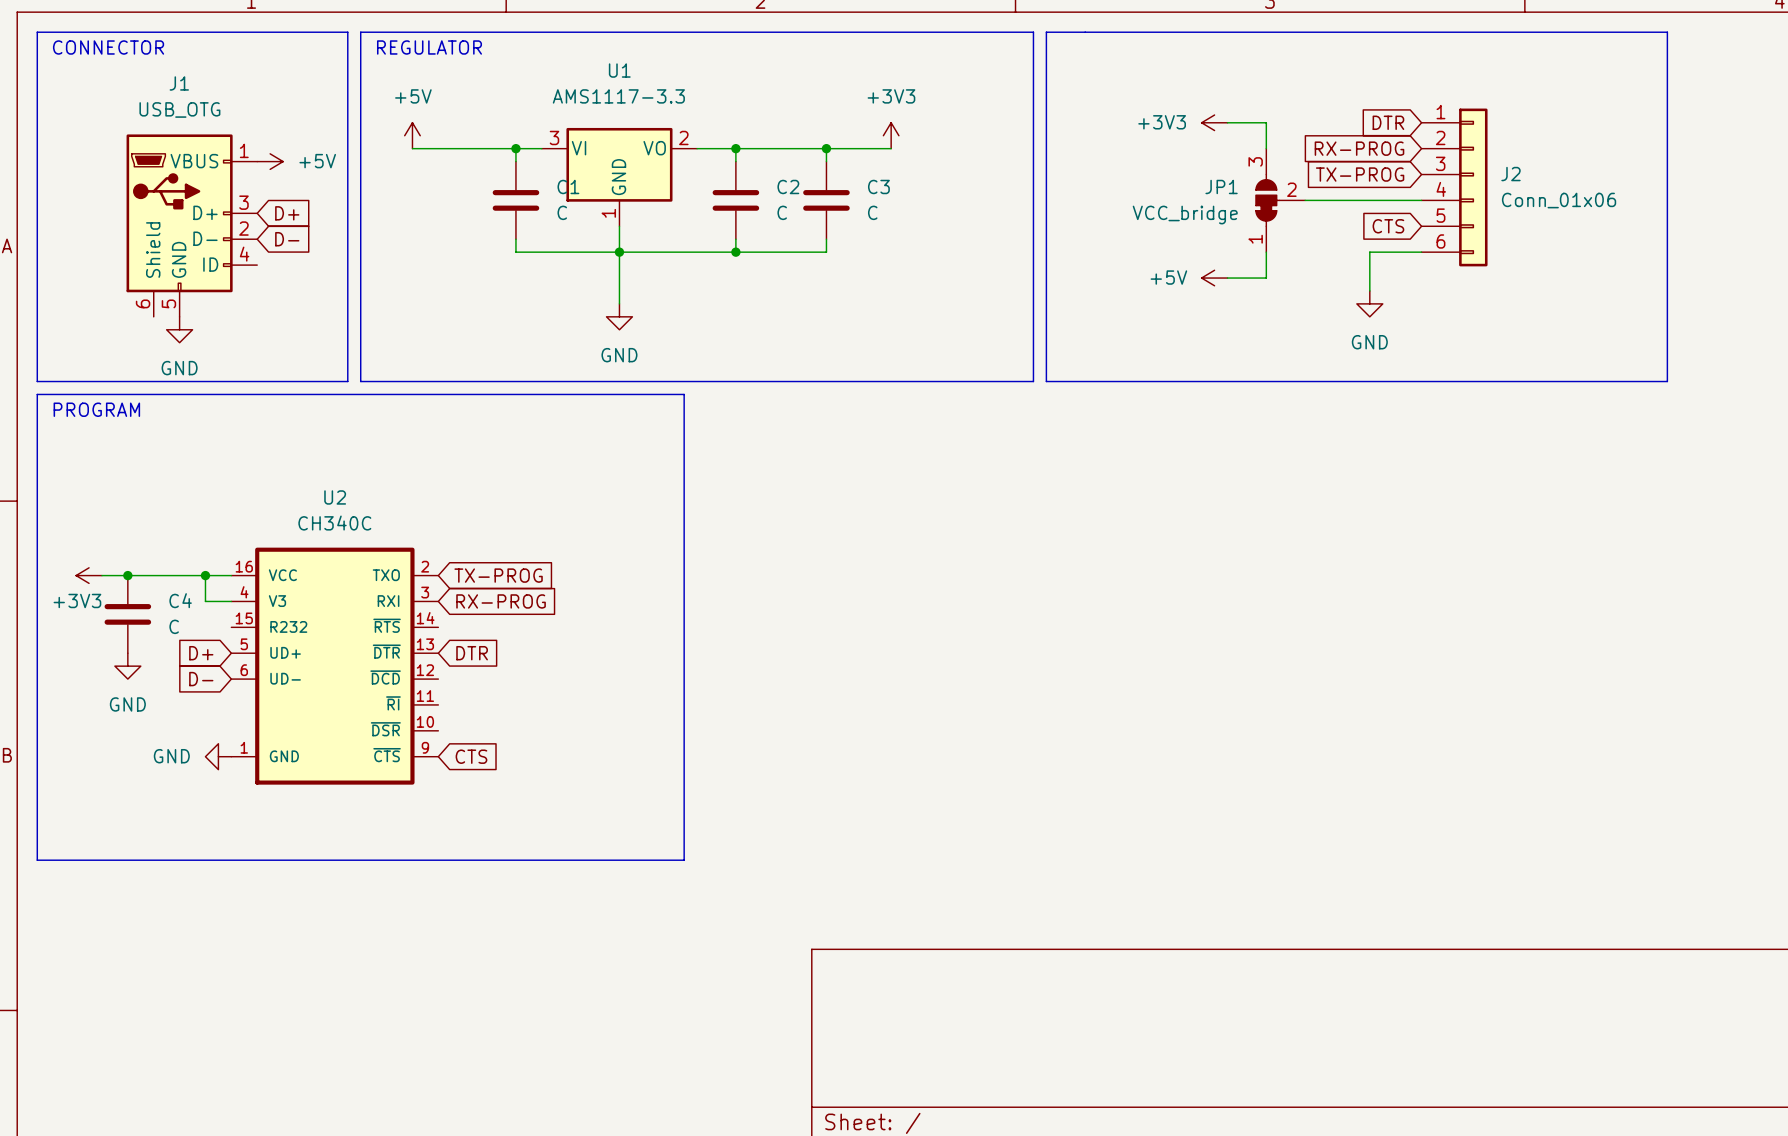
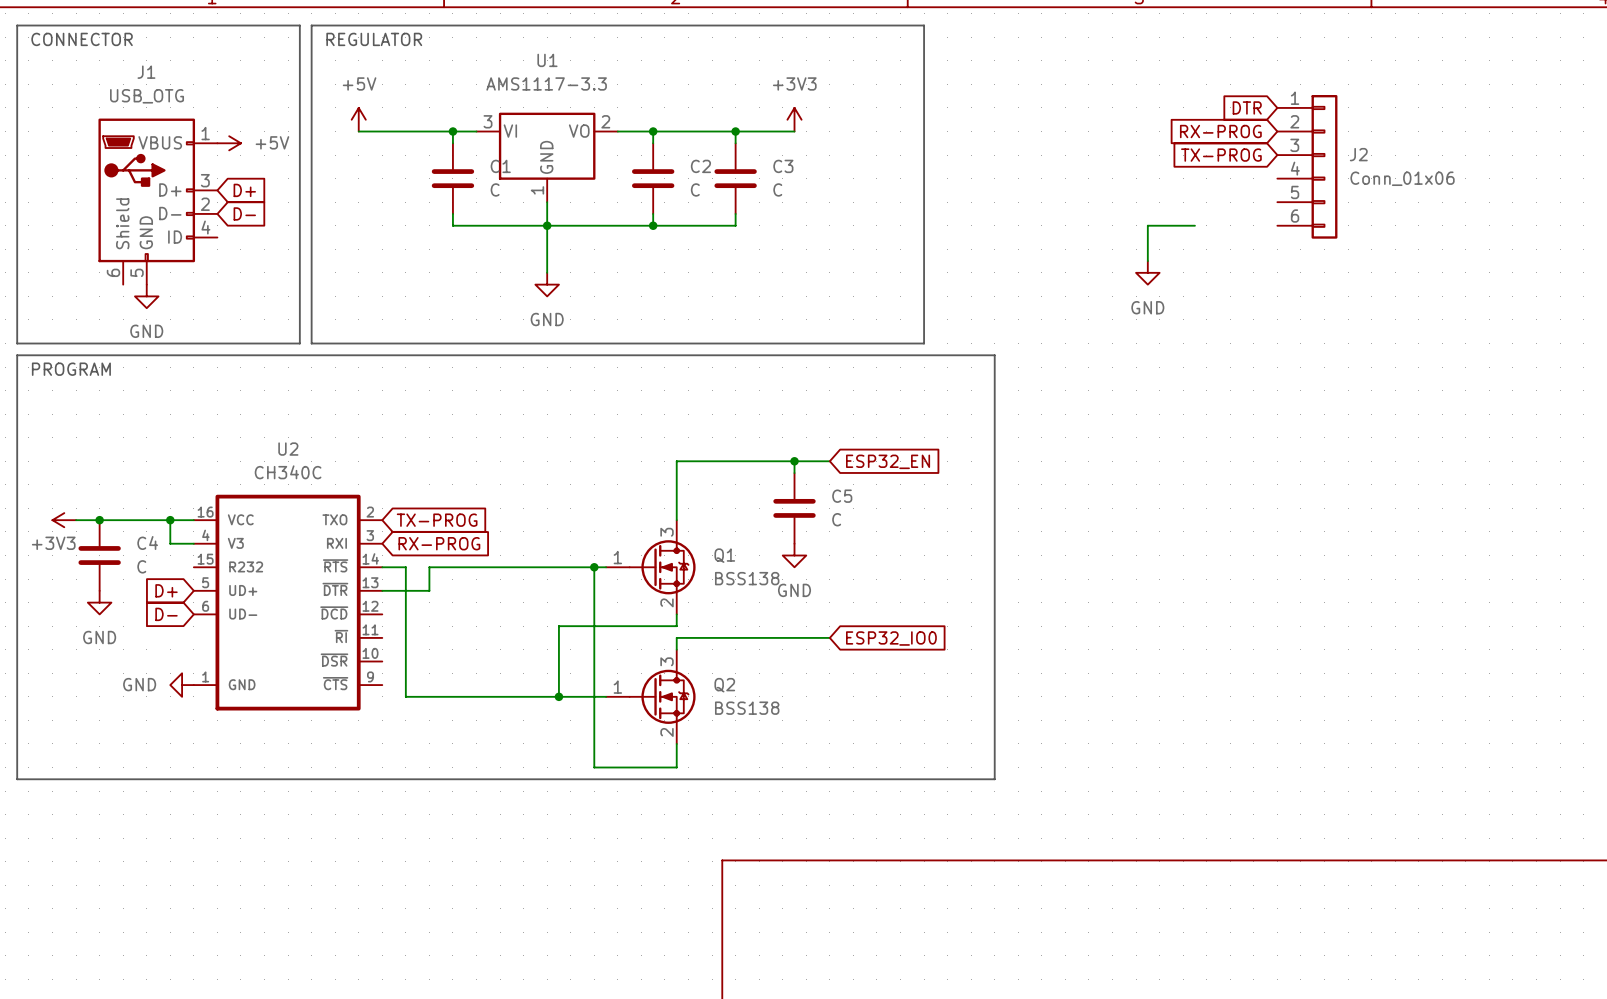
line: (1046, 32) (1667, 32) (1667, 381) (1046, 381) (1046, 32) -> none
power symbol: +3V3 (1214, 122) -> none
wire: (1227, 122) (1266, 122) (1266, 148) -> none
JP1: VCC_bridge (1280, 200) -> none
wire: (1305, 200) (1421, 200) -> none
global label: CTS (1388, 226) -> none
wire: (1266, 252) (1266, 278) (1227, 278) -> none
wire: (1421, 252) (1369, 252) (1369, 290) -> (1194, 225) (1147, 225) (1147, 261)
power symbol: +5V (1214, 278) -> none
power symbol position: GND (1369, 303) -> GND (1147, 272)
line: (684, 394) (684, 860) -> (606, 355) (994, 355) (994, 779) (606, 779)
wire: none -> (794, 461) (794, 473)
junction: none -> (794, 461)
wire: none -> (829, 461) (676, 461) (676, 520)
global label: none -> ESP32_EN (888, 461)
C5: none -> C (794, 508)
power symbol: none -> GND (794, 555)
wire: none -> (382, 567) (405, 567) (405, 696) (606, 696)
wire: none -> (594, 567) (594, 767) (676, 767) (676, 743)
junction: none -> (594, 567)
wire: none -> (606, 567) (429, 567) (429, 590) (382, 590)
Q1: none -> BSS138 (650, 567)
global label: DTR (472, 653) -> none
wire: none -> (676, 614) (676, 626) (558, 626) (558, 696)
wire: none -> (829, 637) (676, 637) (676, 649)
global label: none -> ESP32_IO0 (891, 638)
global label: CTS (471, 756) -> none
junction: none -> (558, 696)
Q2: none -> BSS138 (650, 696)

